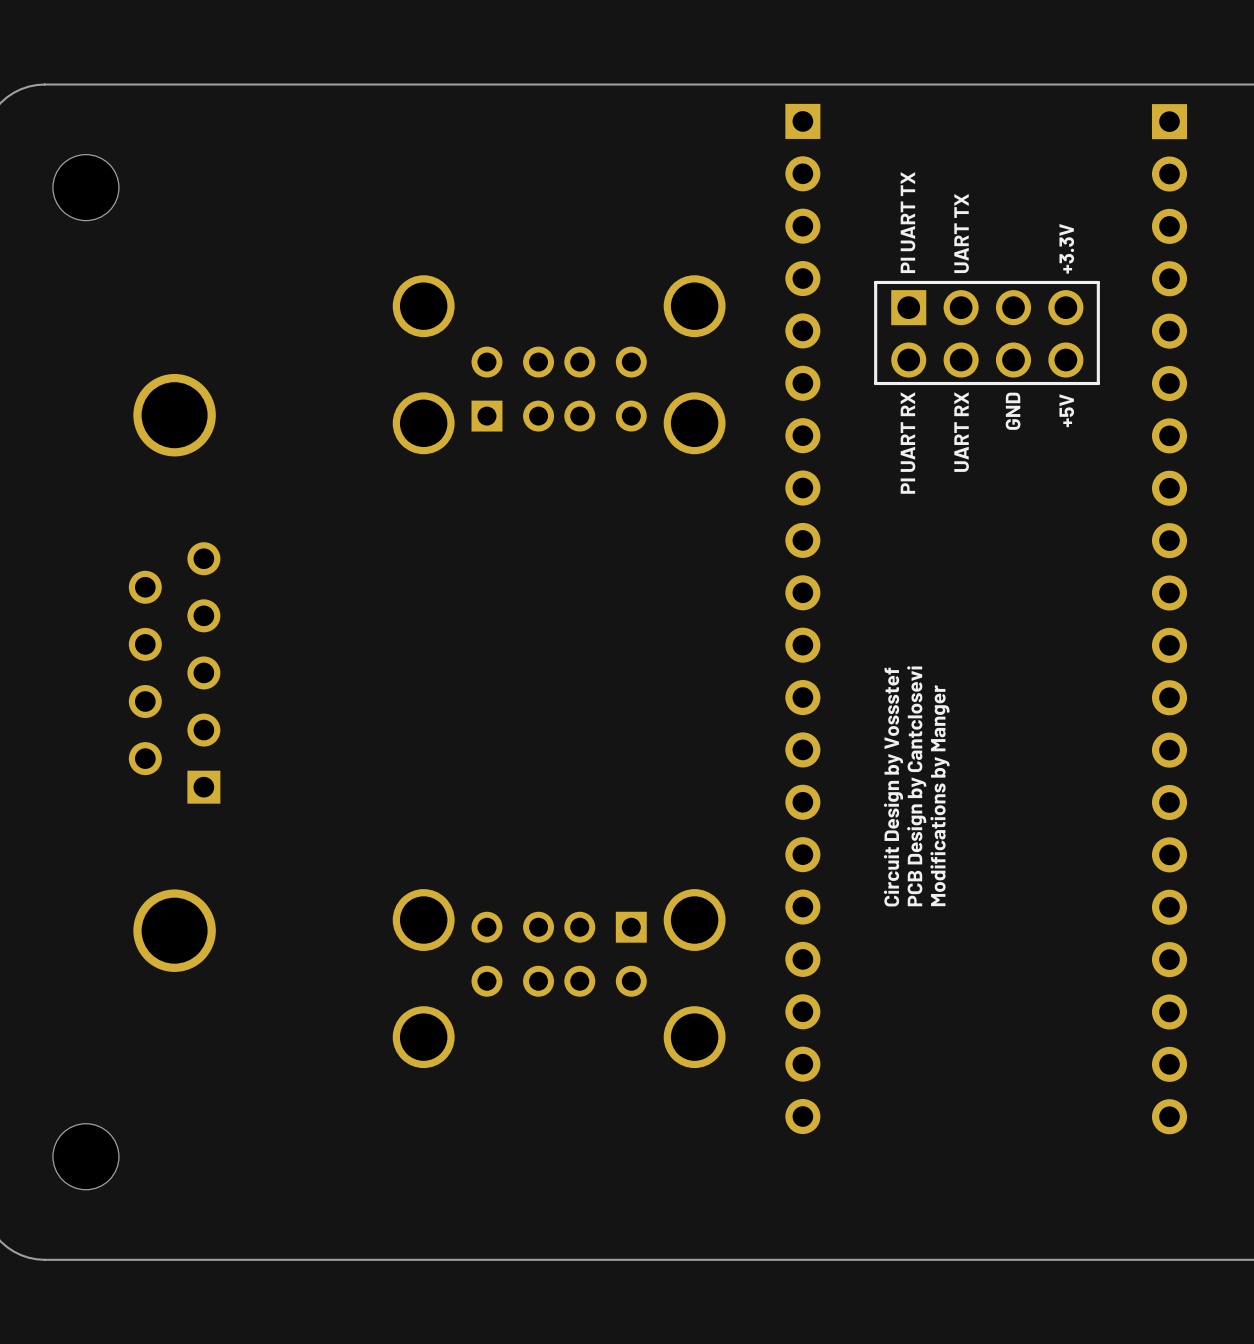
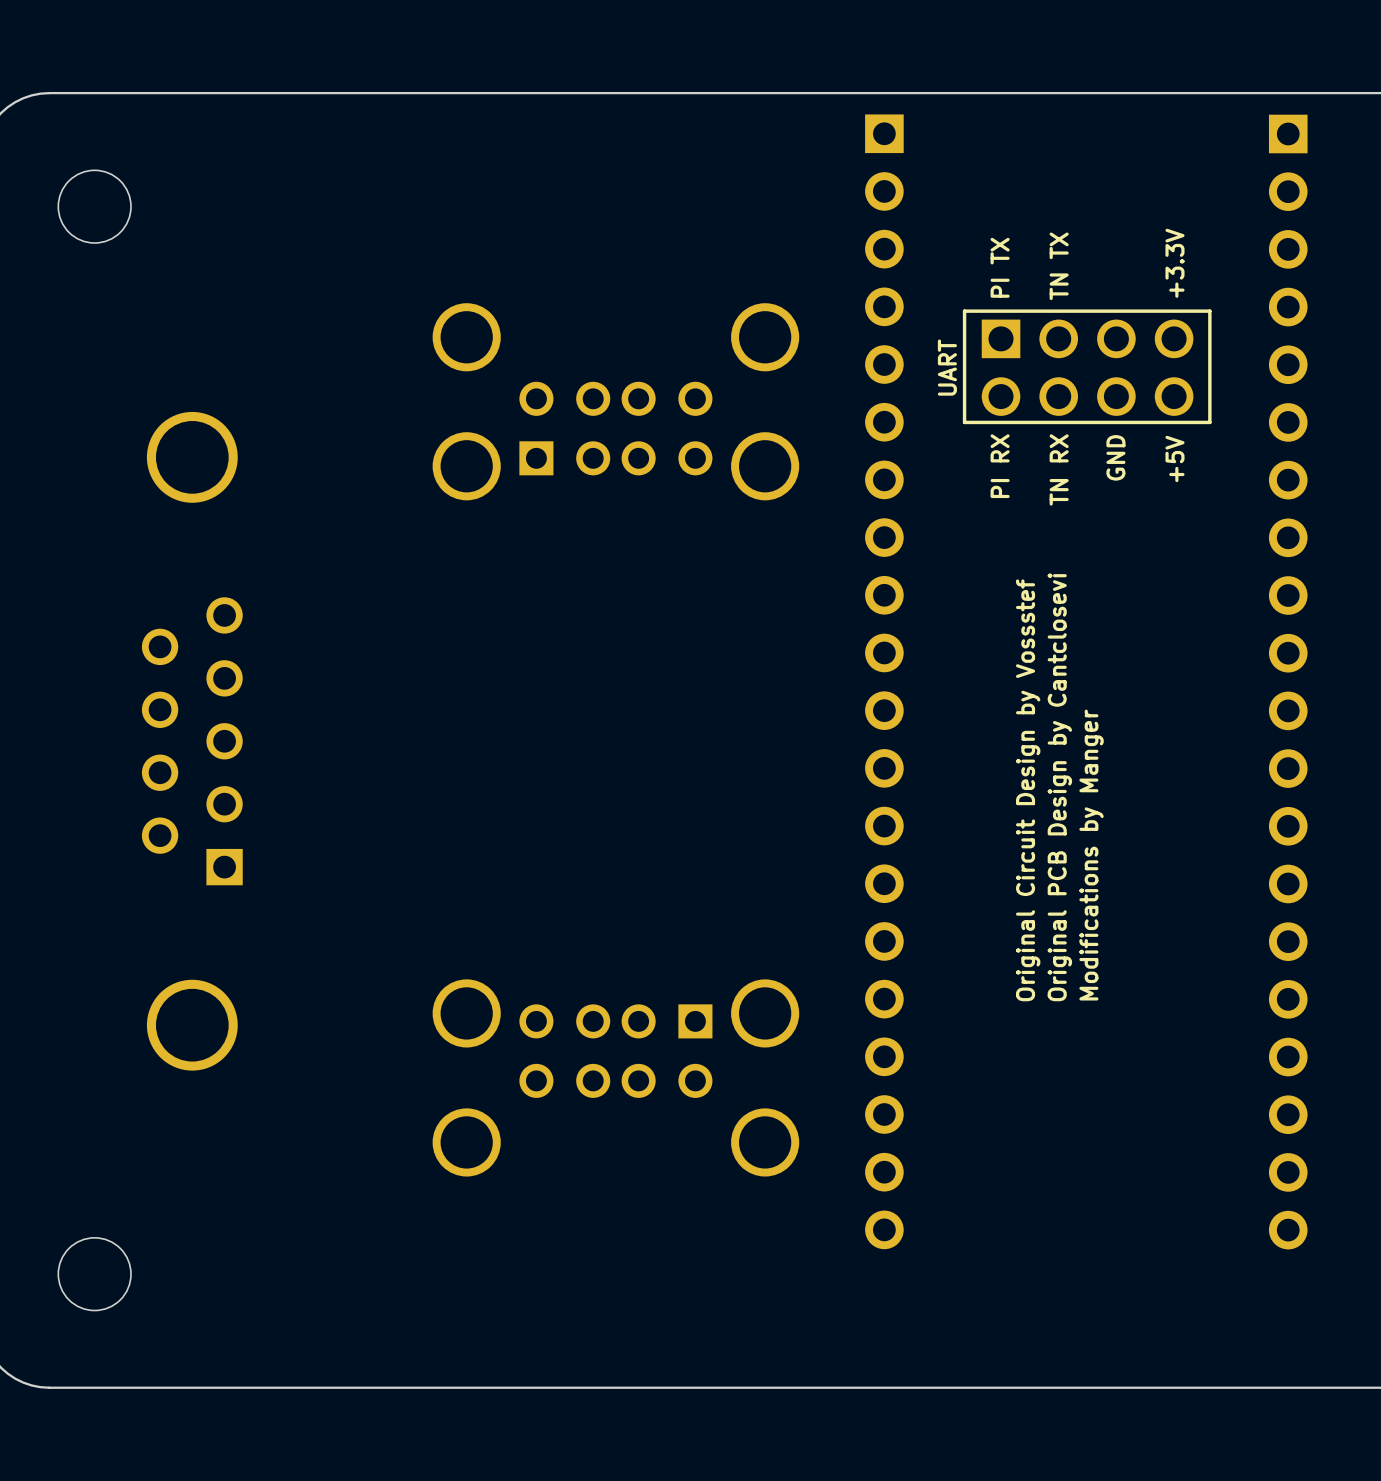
text: PI UART TX (907, 222) -> PI TX (1000, 267)
text: UART TX (961, 233) -> TN TX (1059, 266)
text: none -> UART (947, 367)
text: UART RX (961, 432) -> TN RX (1059, 469)
text: PI UART RX (907, 443) -> PI RX (1000, 466)
text: none -> Original Circuit Design by Vossstef (1028, 790)
text: none -> Original PCB Design by Cantclosevi (1059, 787)
text: PCB Design by Cantclosevi (916, 786) -> none
text: Circuit Design by Vossstef (893, 787) -> none
text position: Modifications by Manger (939, 795) -> Modifications by Manger (1091, 855)

